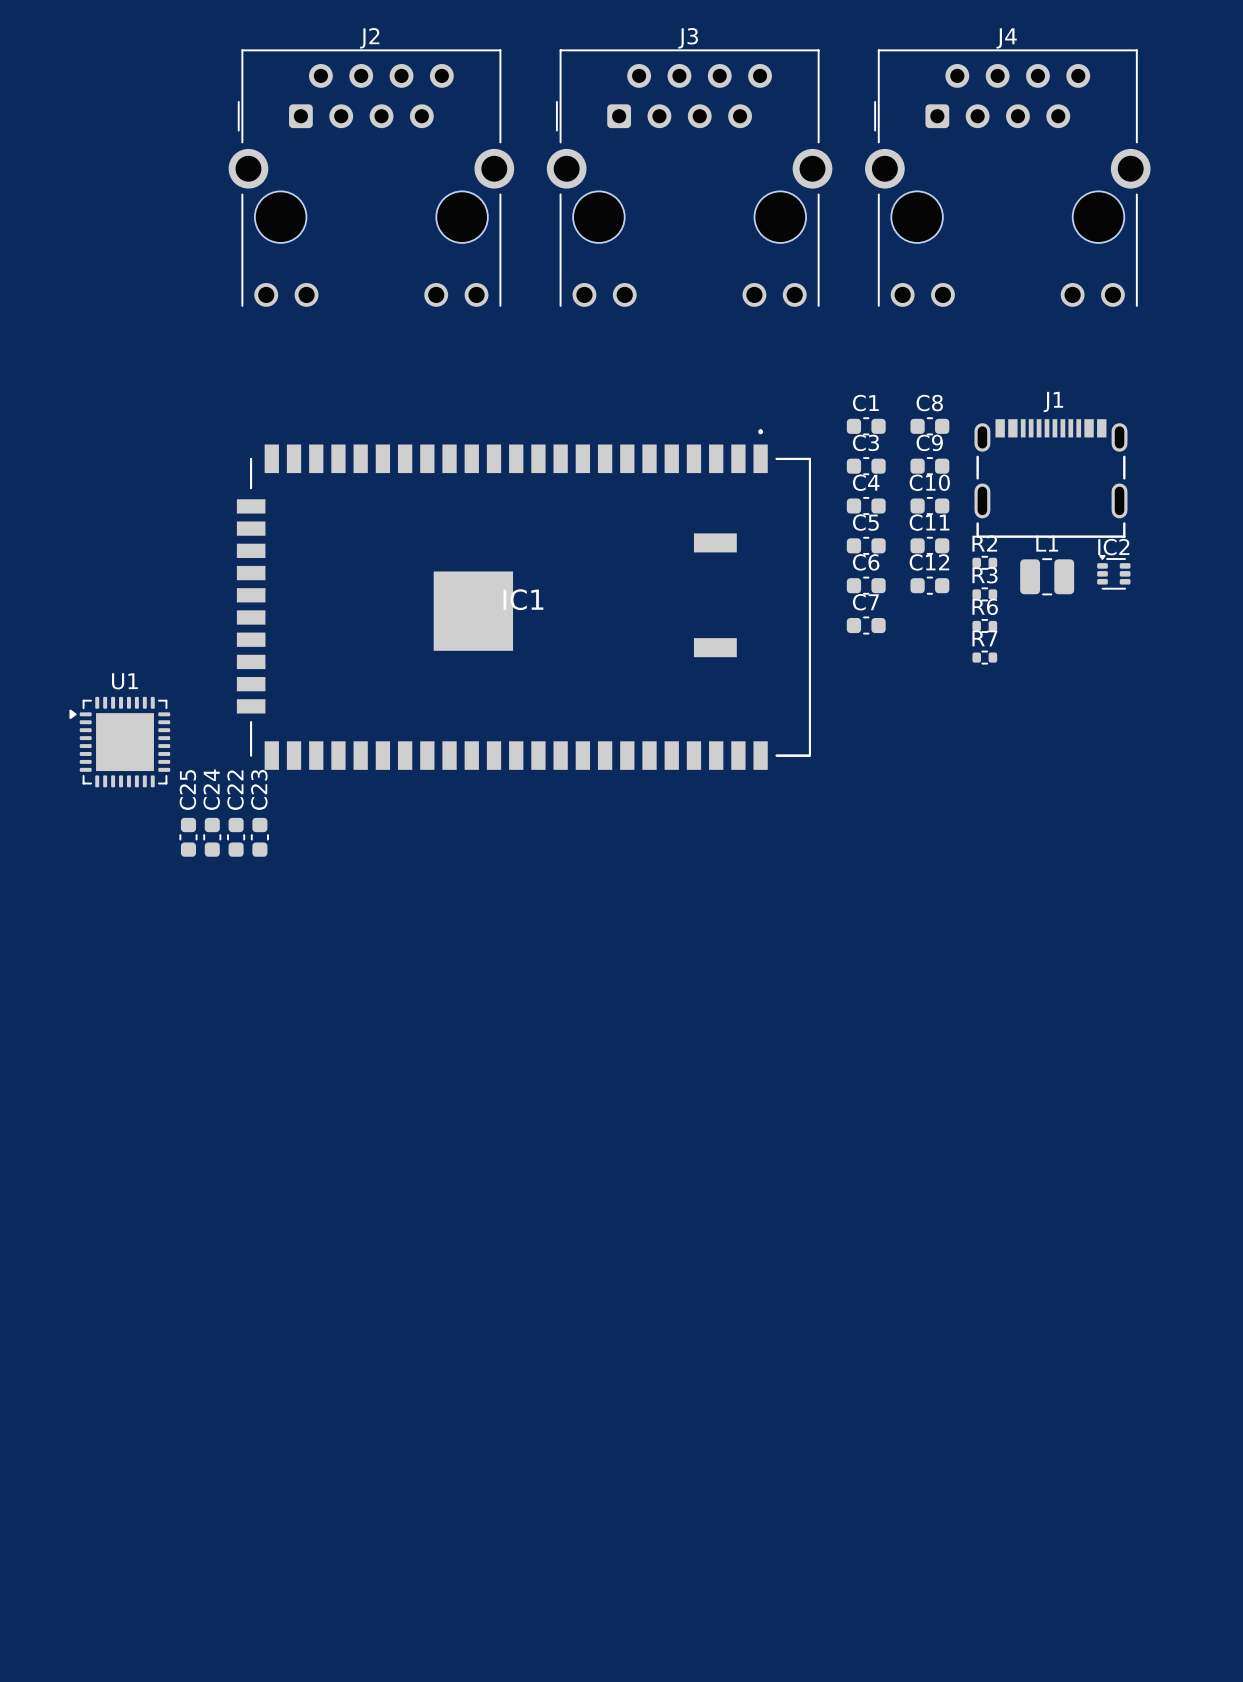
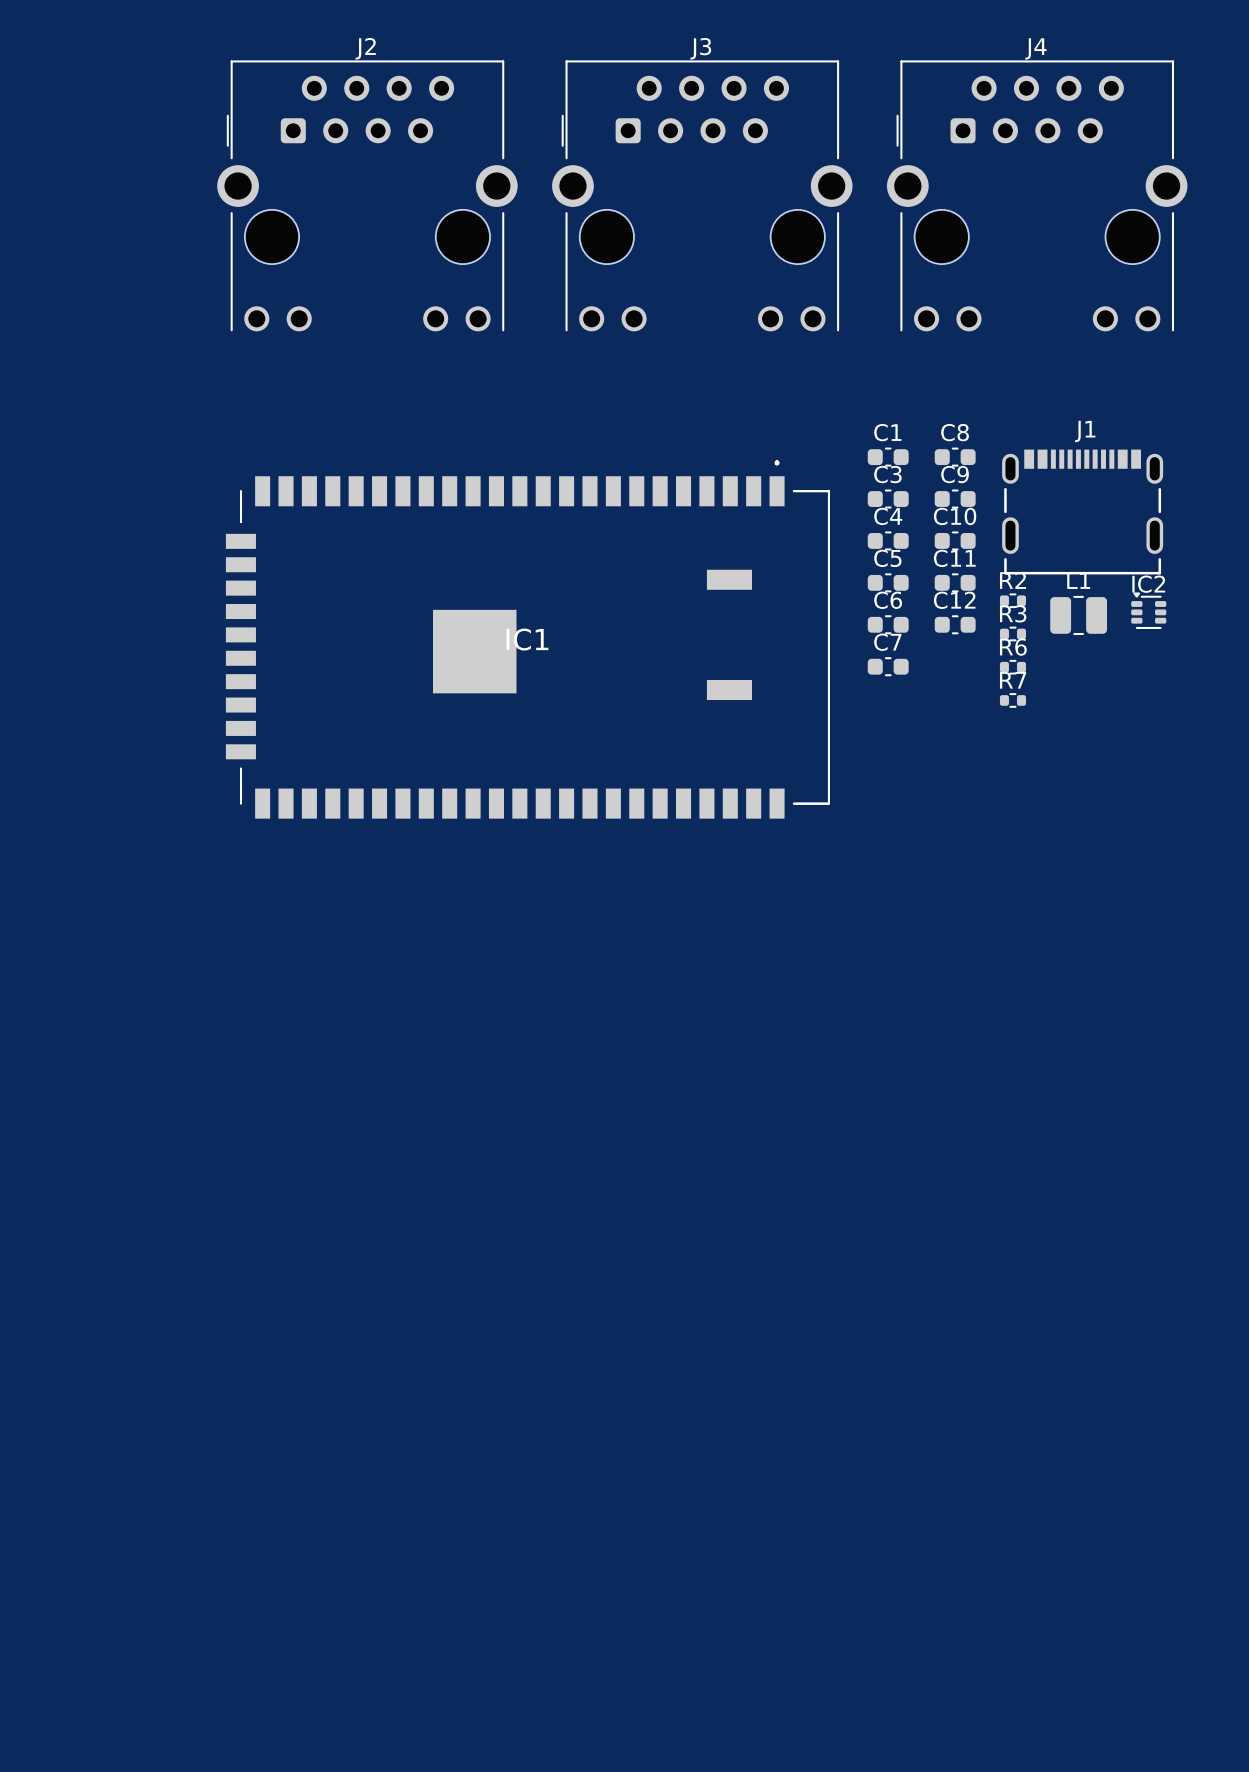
U1: (119, 742) -> none
C25: (188, 837) -> none
C24: (212, 837) -> none
C22: (236, 837) -> none
C23: (259, 837) -> none

